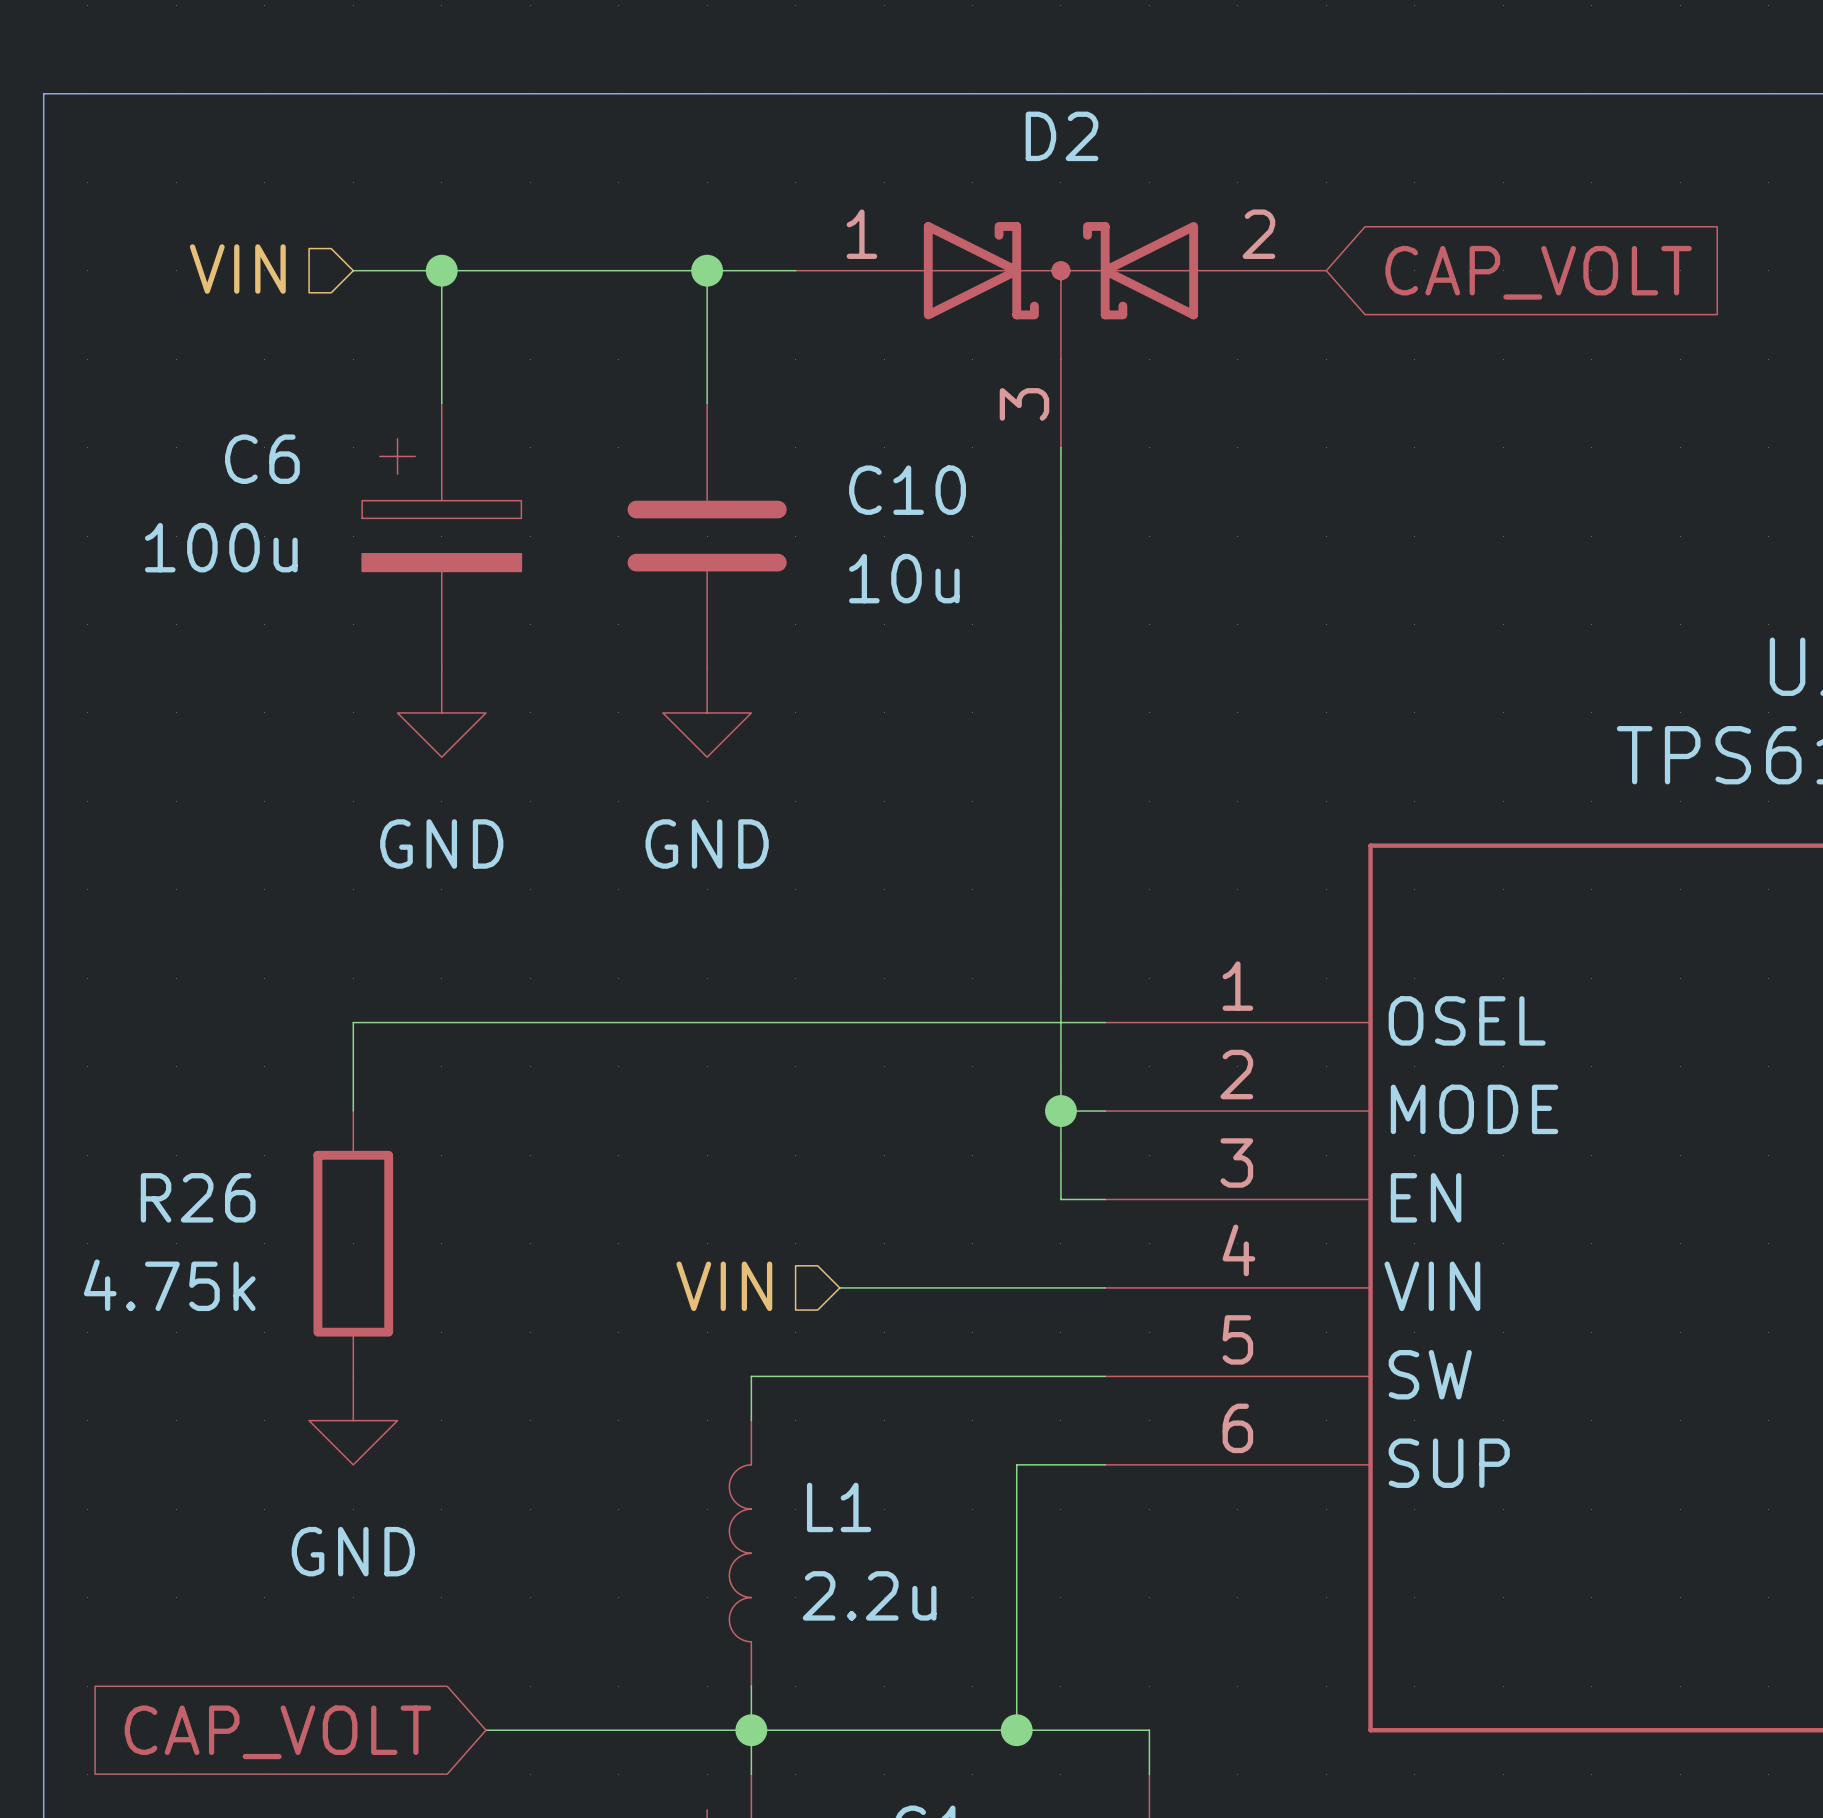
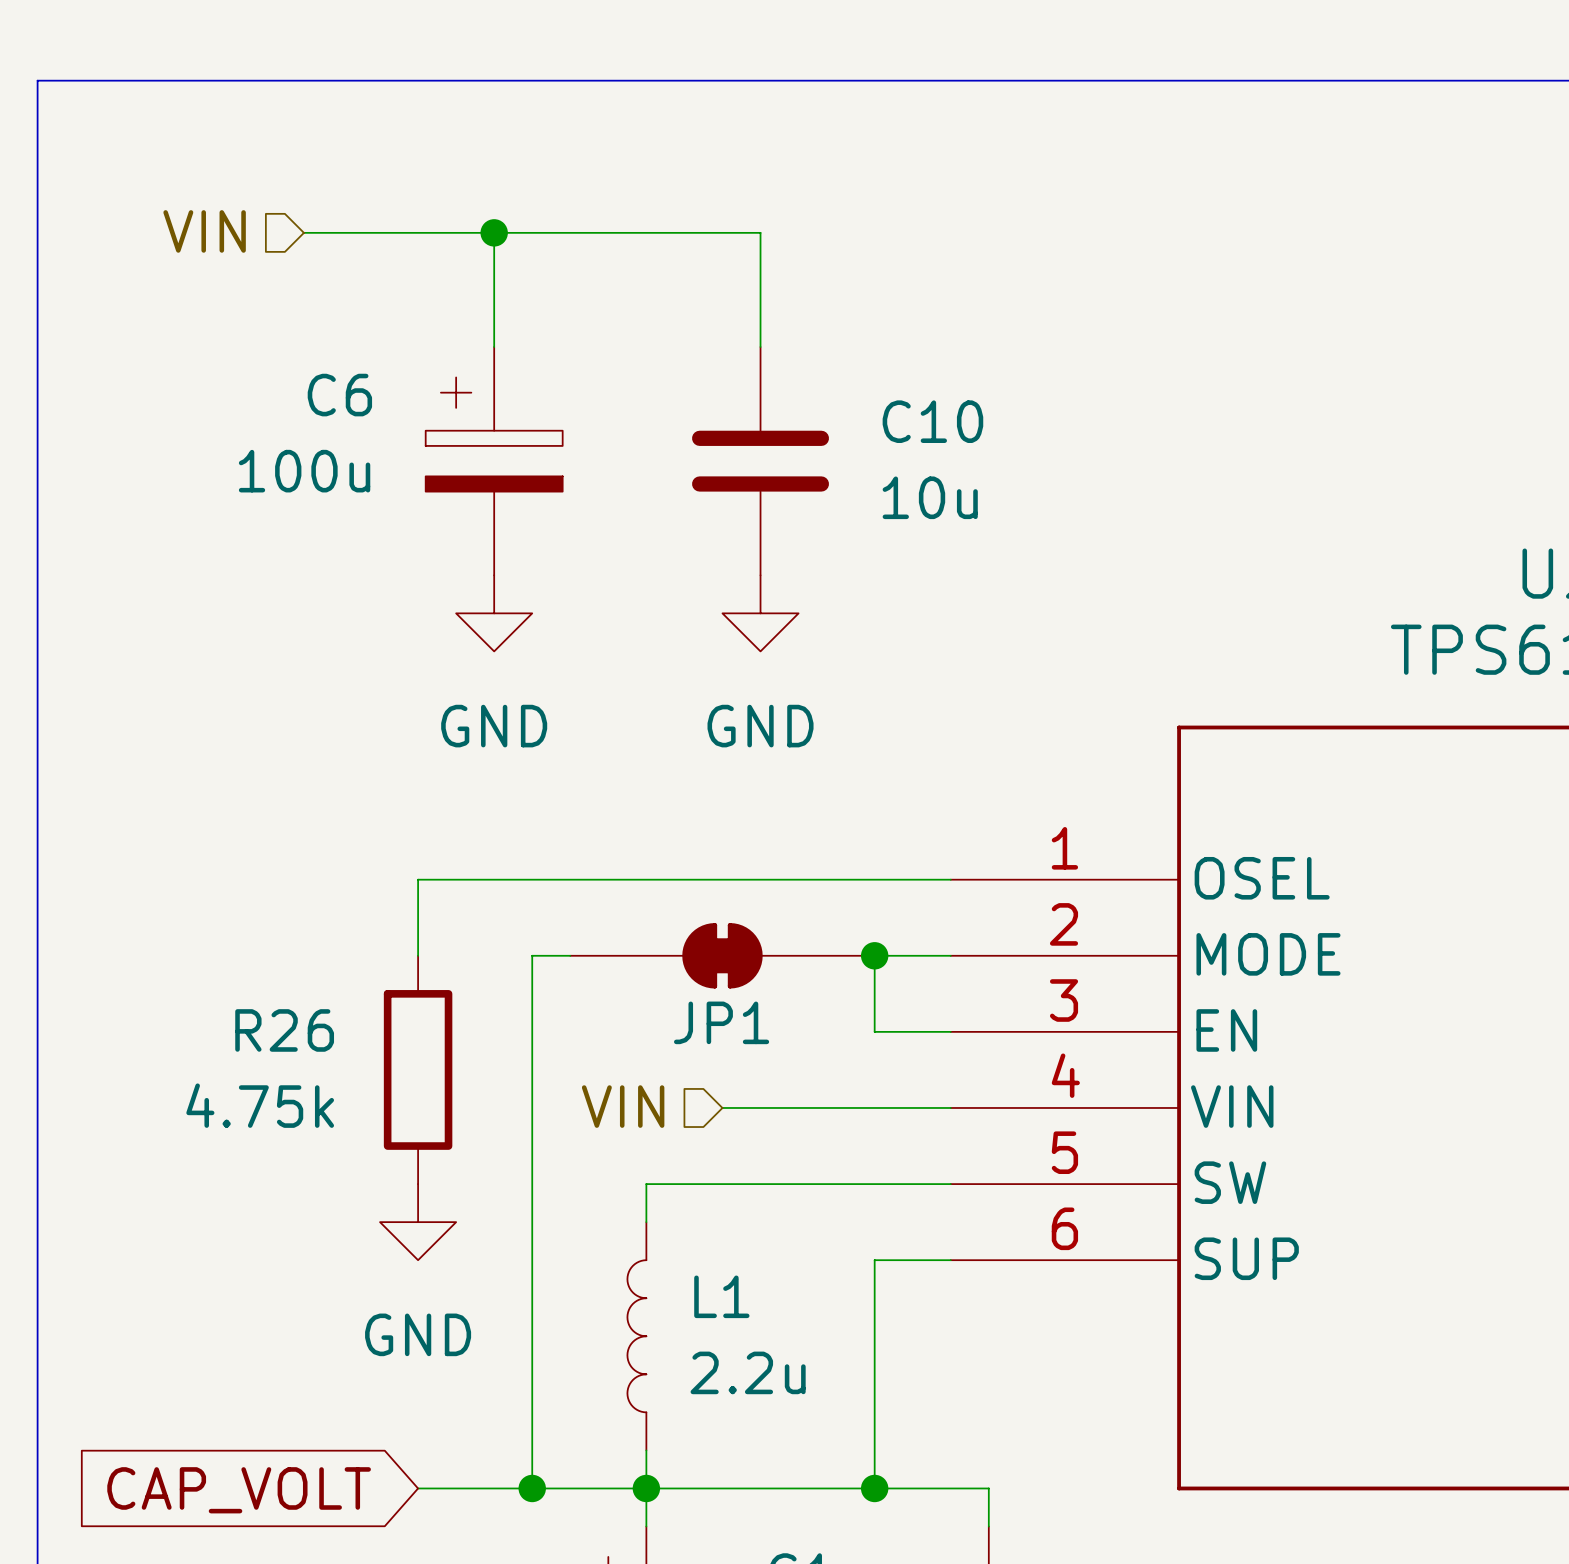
wire: (441, 270) (441, 403) -> (494, 232) (494, 347)
junction: (441, 270) -> none
junction: none -> (494, 232)
wire: (707, 270) (707, 403) -> none
junction: (707, 270) -> none
wire: none -> (684, 232) (760, 232) (760, 347)
global label: CAP_VOLT (1538, 272) -> none
D2: (1060, 334) -> none
wire: (1060, 447) (1060, 1199) -> (912, 955) (874, 955) (874, 1031) (912, 1031)
C6 position: (441, 536) -> (494, 461)
C10 position: (707, 536) -> (760, 461)
power symbol: GND (441, 712) -> none
power symbol: none -> GND (494, 613)
power symbol: GND (707, 712) -> none
power symbol: none -> GND (760, 613)
wire: (485, 1022) (353, 1022) (353, 1111) -> (418, 879) (418, 955)
wire: none -> (570, 955) (532, 955) (532, 1488)
JP1: none -> (722, 955)
junction position: (1060, 1111) -> (874, 955)
R26 position: (353, 1243) -> (418, 1069)
power symbol position: GND (353, 1420) -> GND (418, 1222)
junction: none -> (532, 1488)

